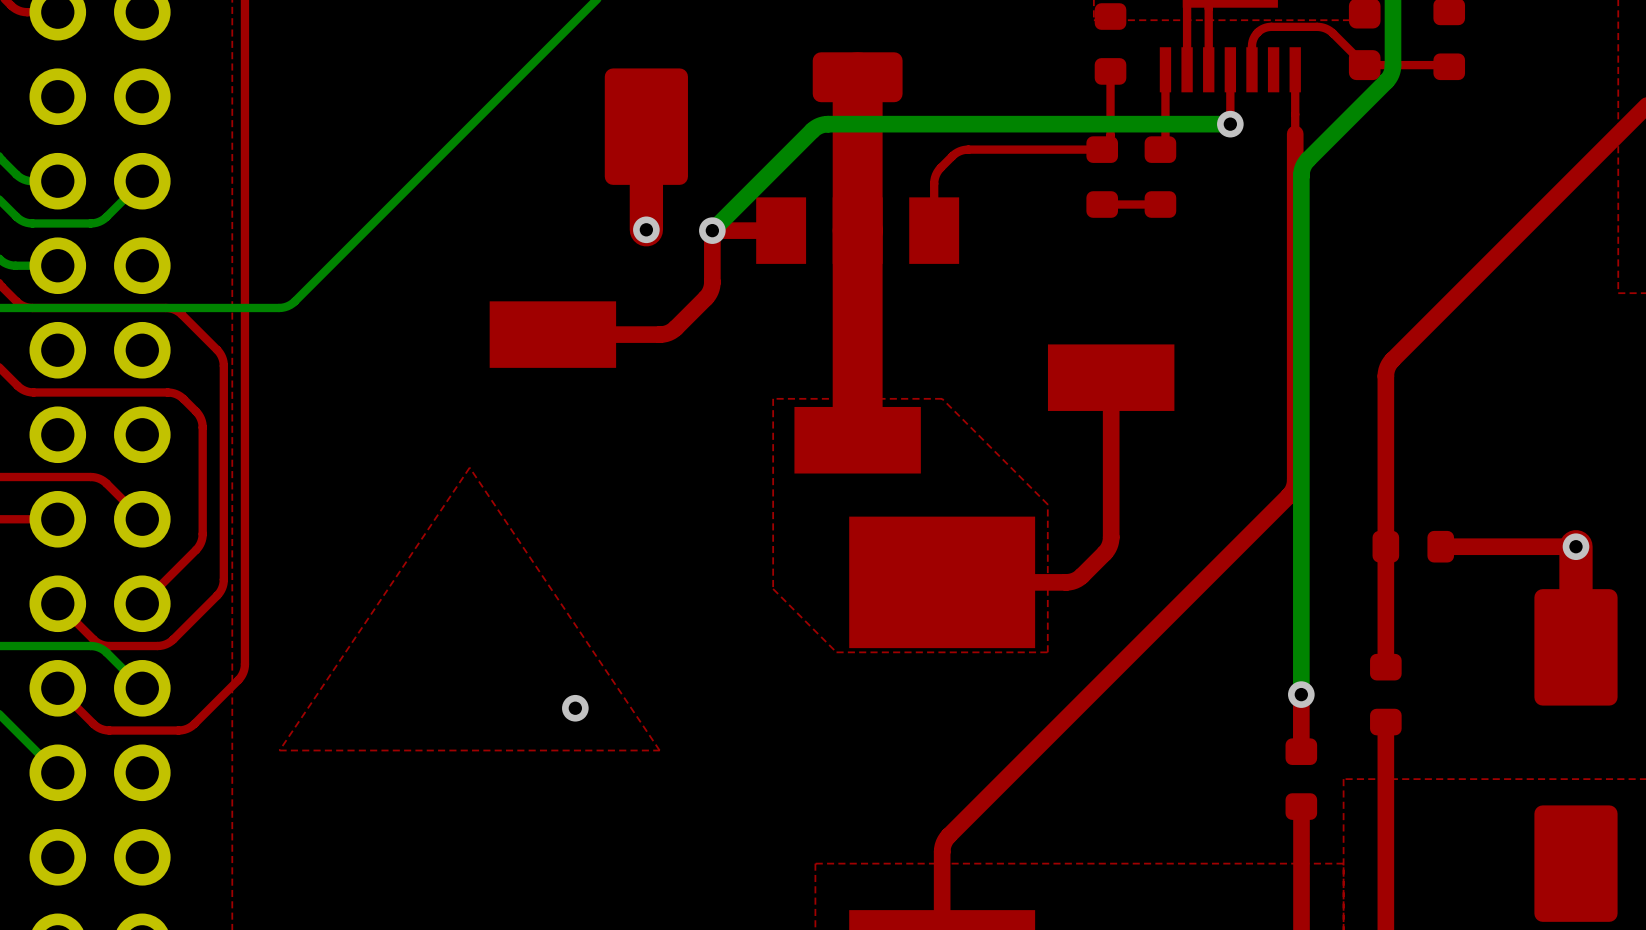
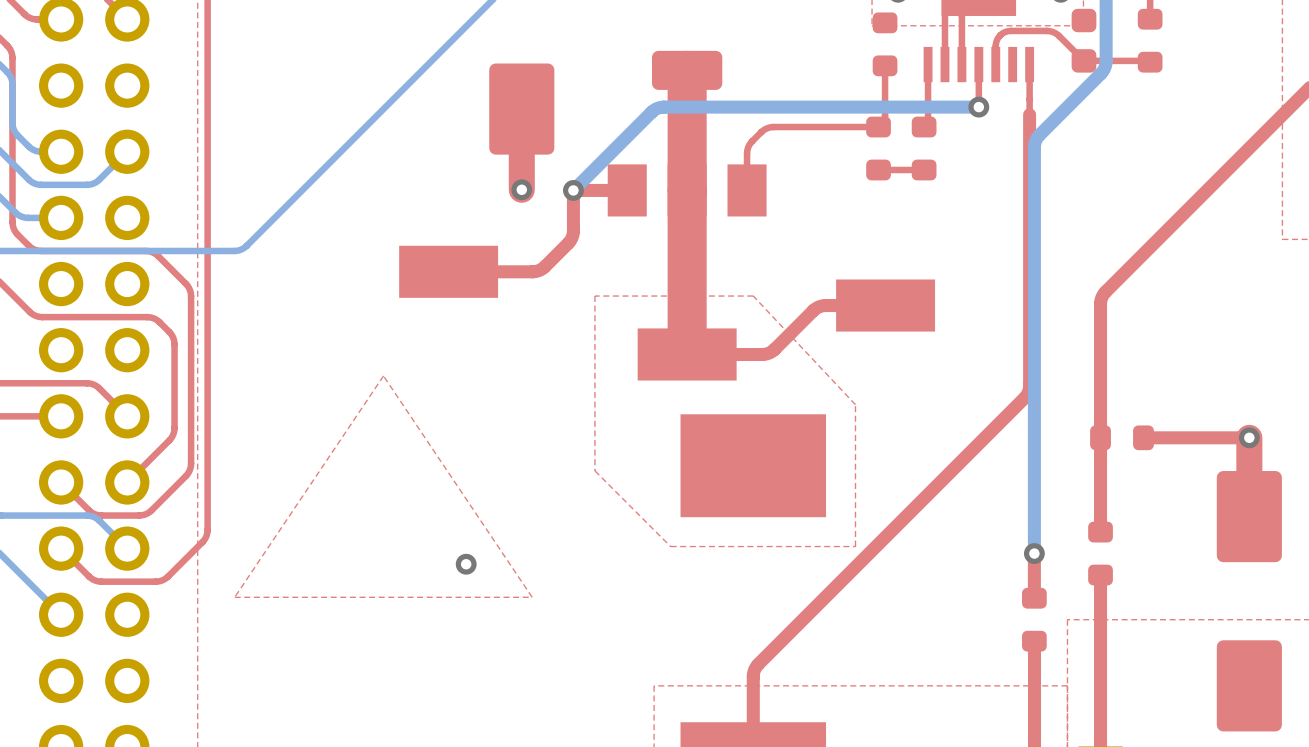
top track: (1111, 377) (1111, 537) (1106, 551) (1079, 577) (1069, 582) (942, 582) -> (885, 305) (819, 306) (774, 349) (766, 353) (687, 354)
top zone outline: (942, 398) (1047, 504) (1047, 652) (836, 652) (773, 588) (773, 398) (942, 398) -> (753, 296) (855, 404) (855, 546) (670, 546) (594, 470) (594, 296) (753, 296)

